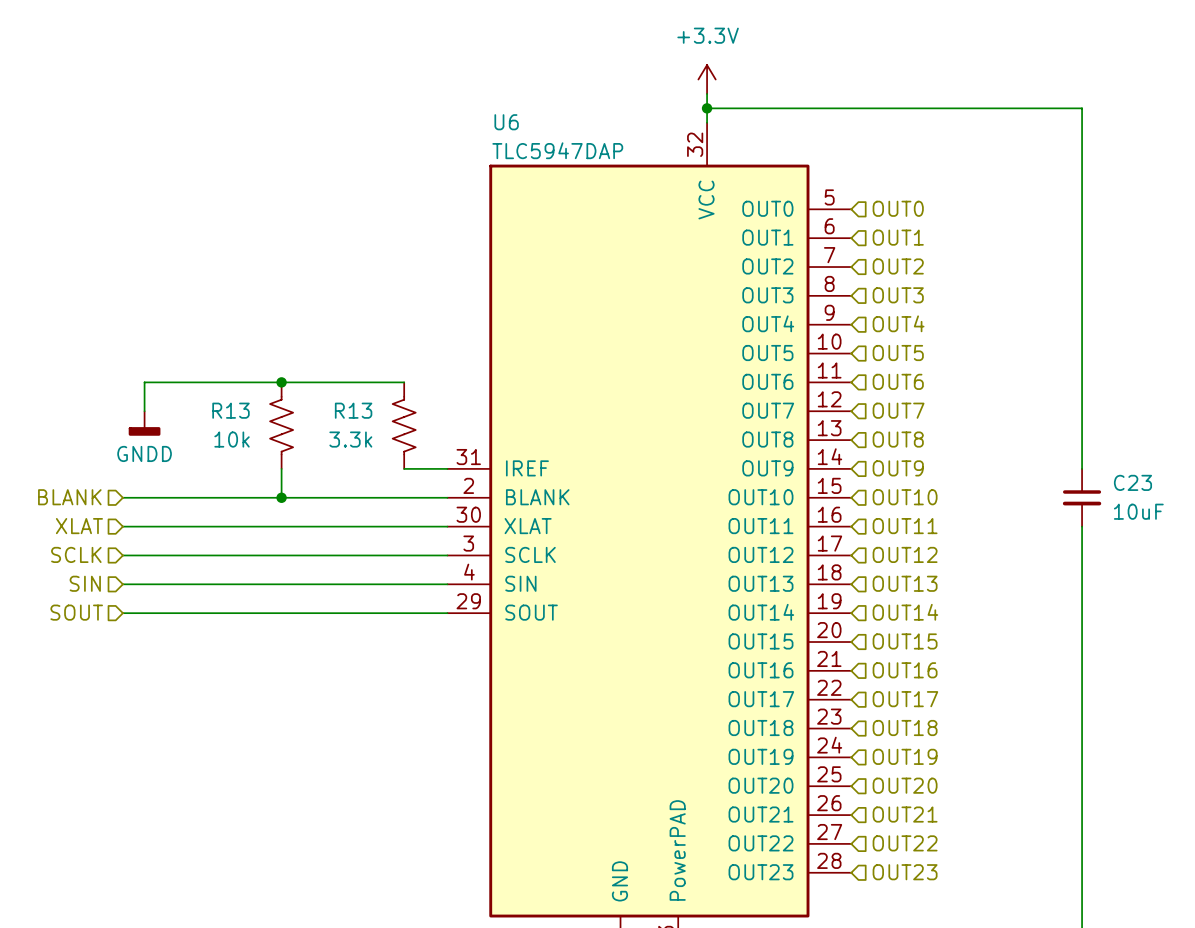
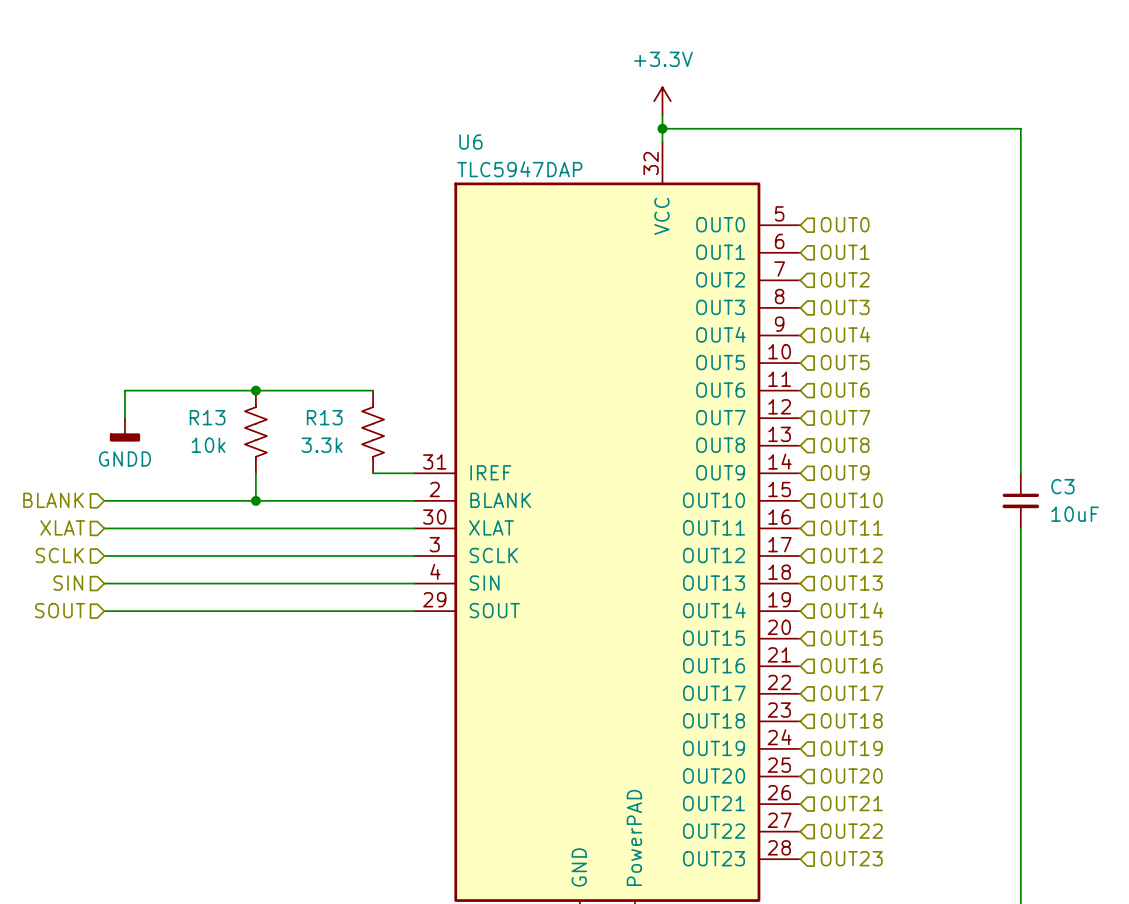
C23 name: C23 (1132, 482) -> C3 (1062, 486)

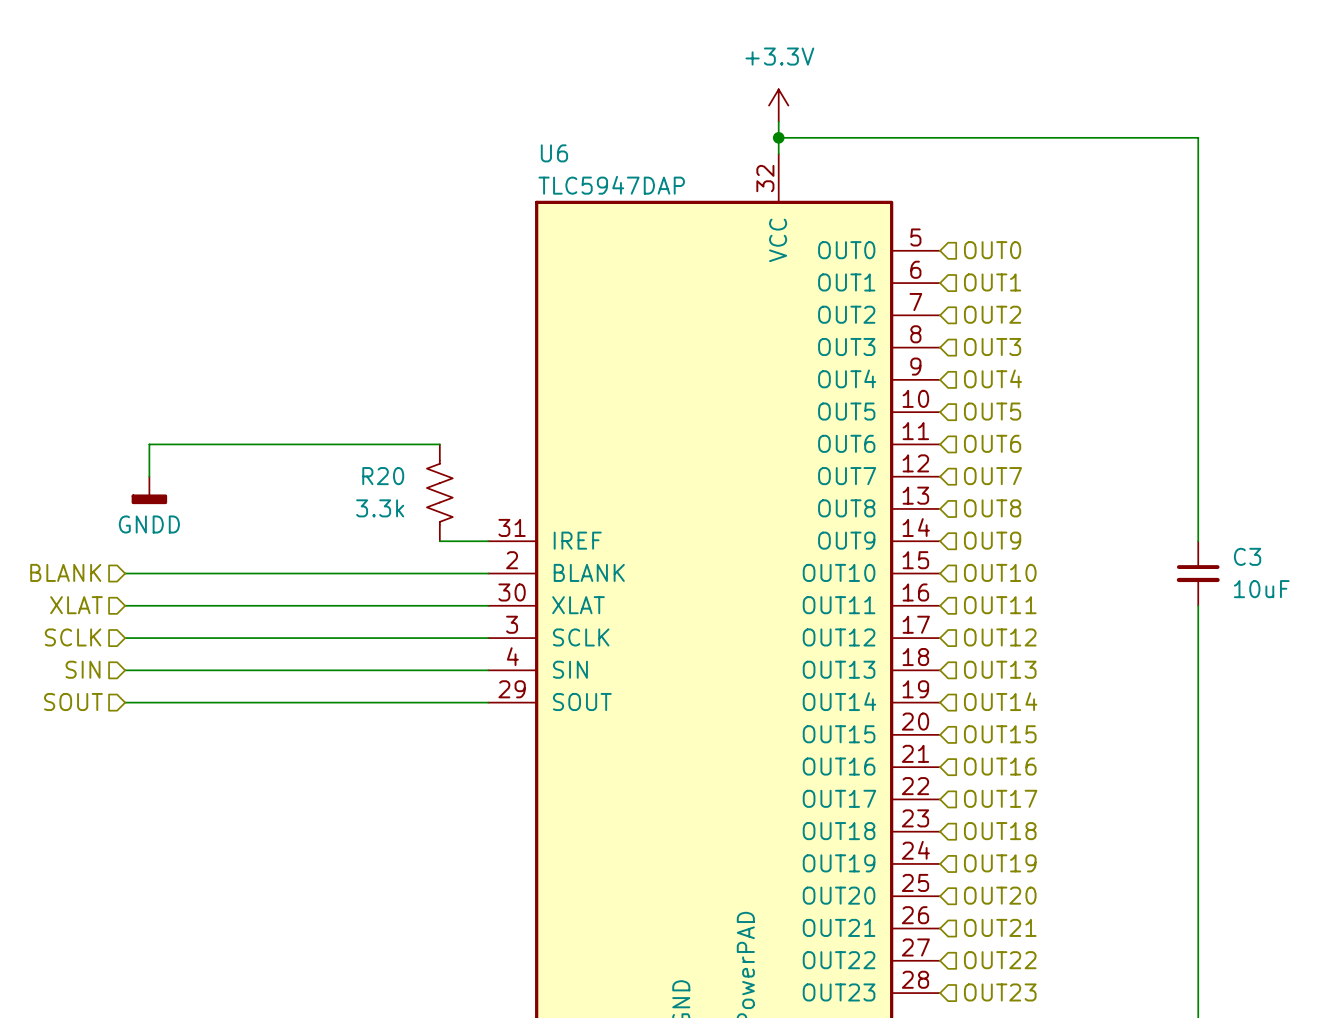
junction: (255, 390) -> none
R13 name: R13 (324, 417) -> R20 (383, 476)
R13: 10k (255, 431) -> none
wire: (255, 473) (255, 500) -> none
junction: (255, 500) -> none

